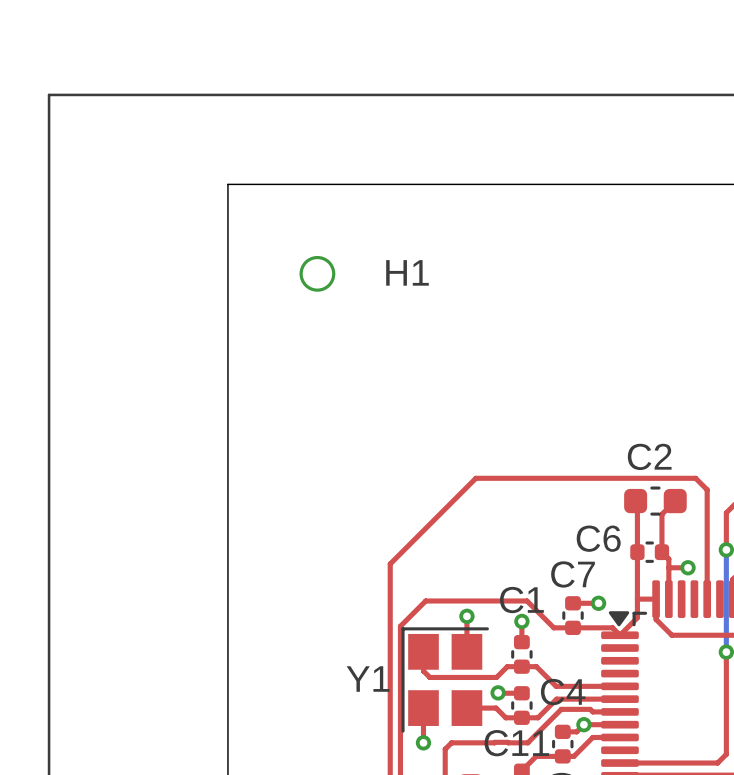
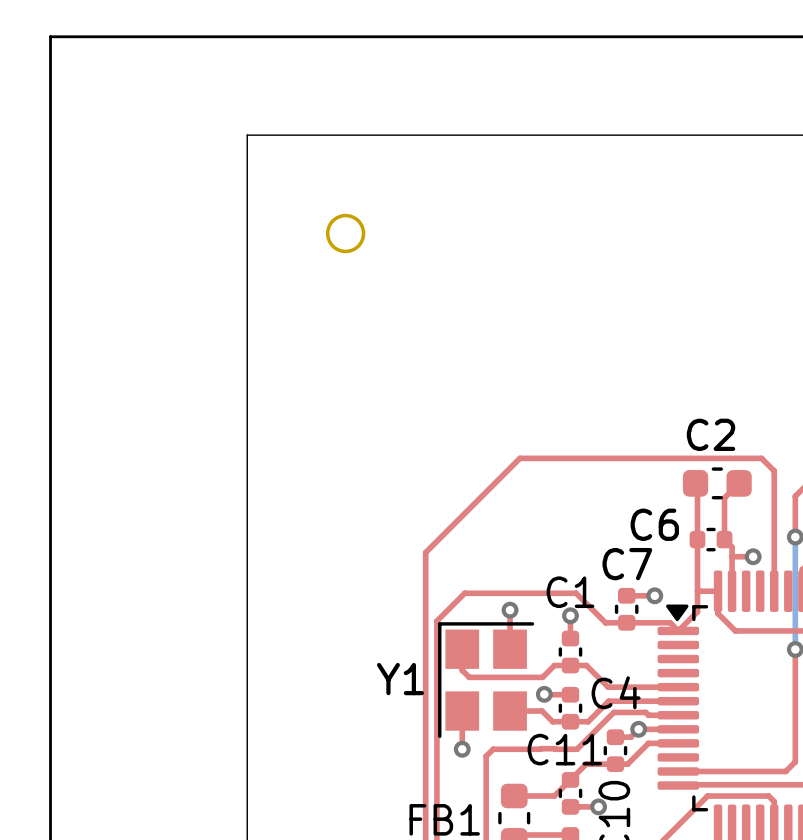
H1 name: H1 (407, 272) -> none

